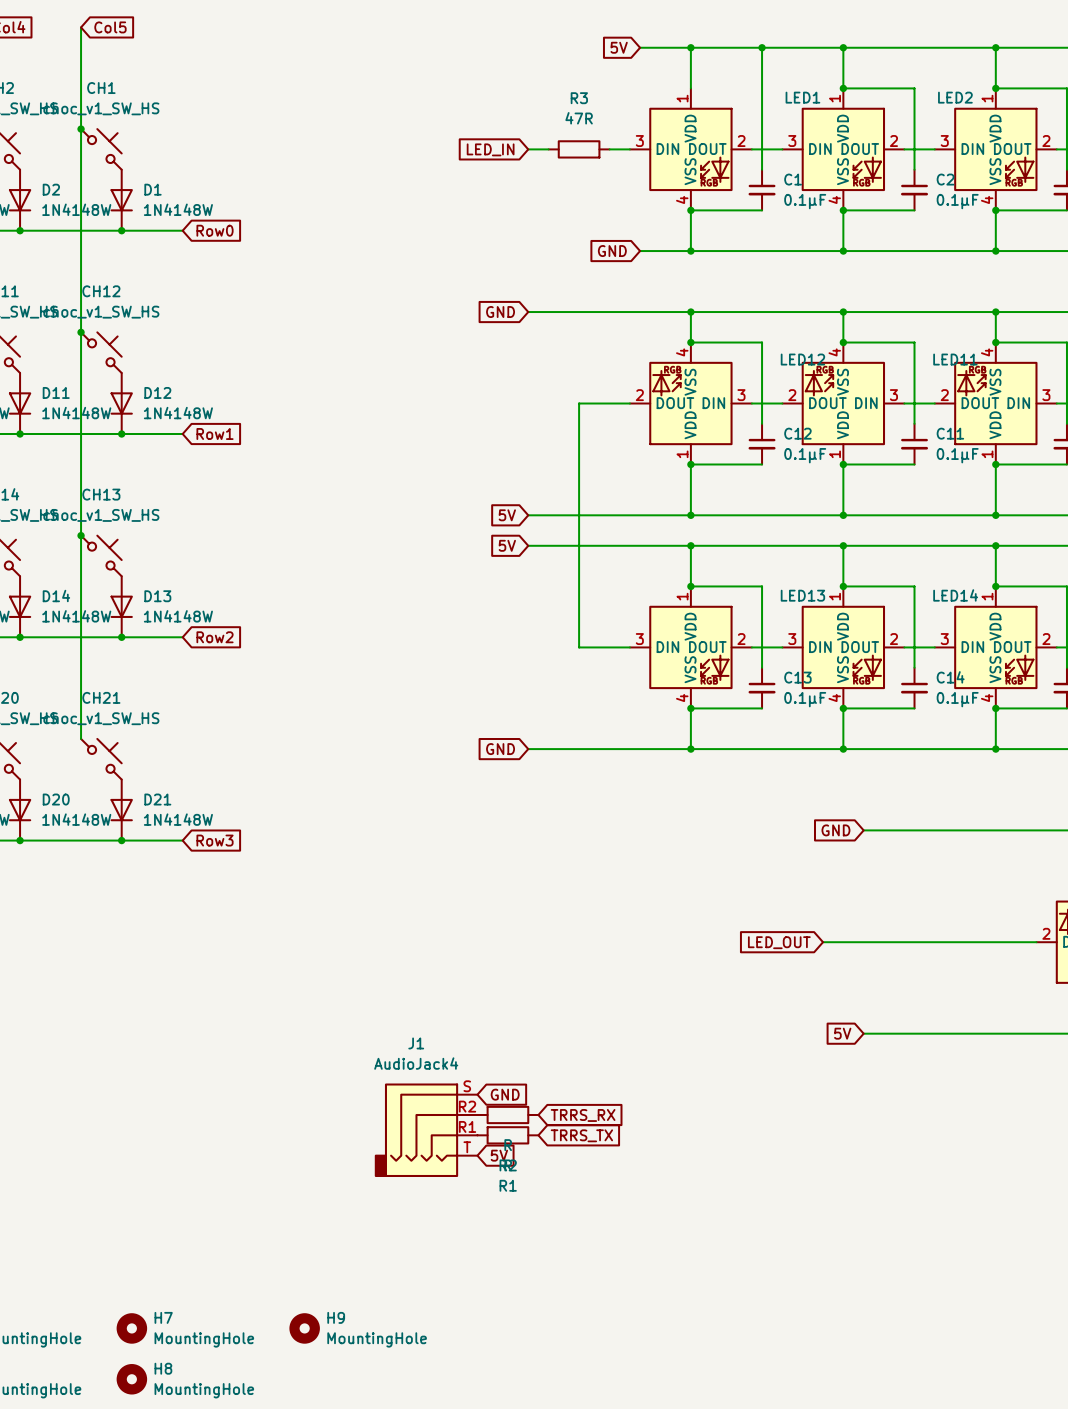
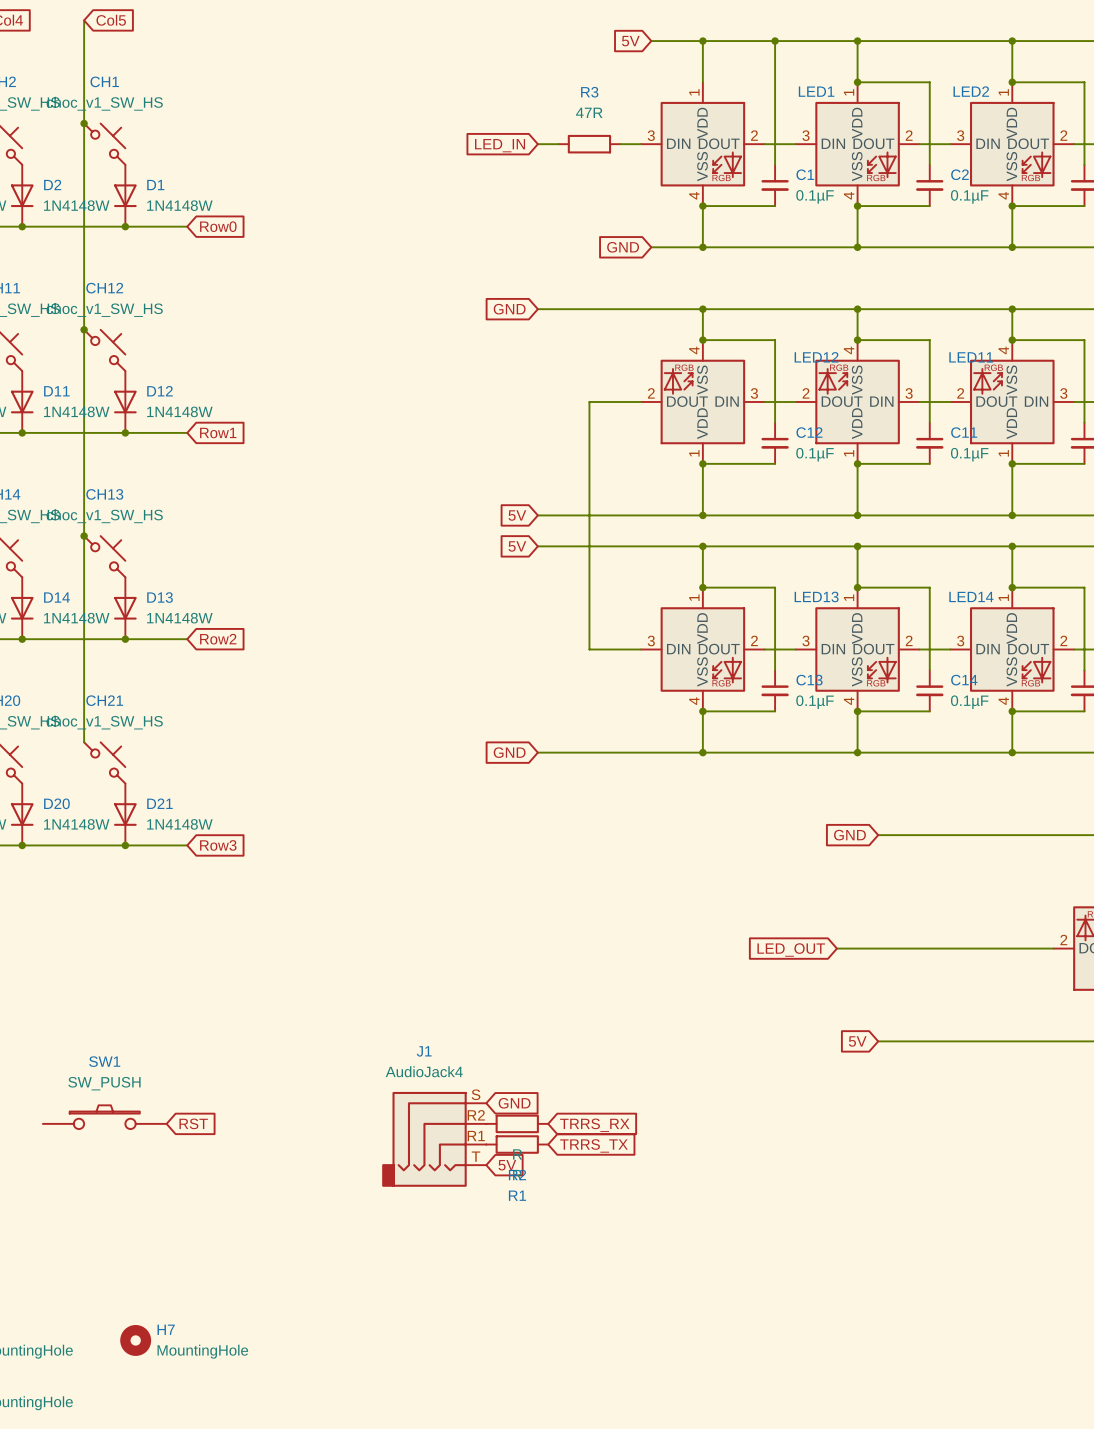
SW1: none -> SW_PUSH (104, 1117)
global label: none -> RST (193, 1123)
H9: MountingHole (304, 1328) -> none
H8: MountingHole (131, 1379) -> none

